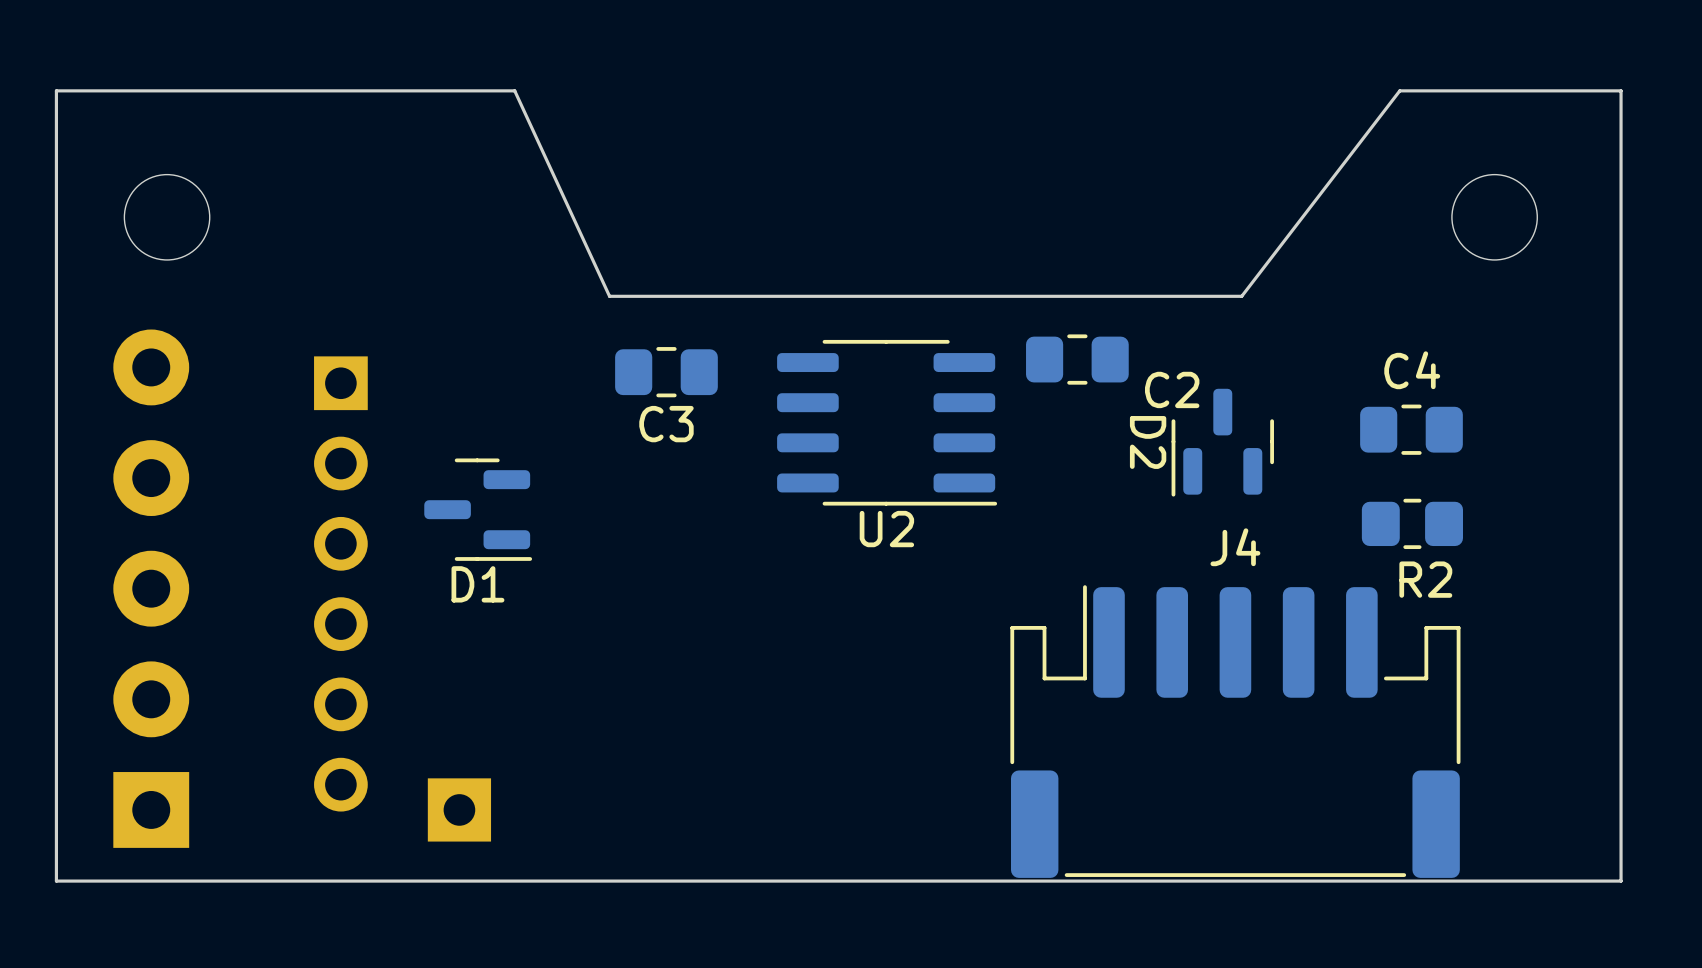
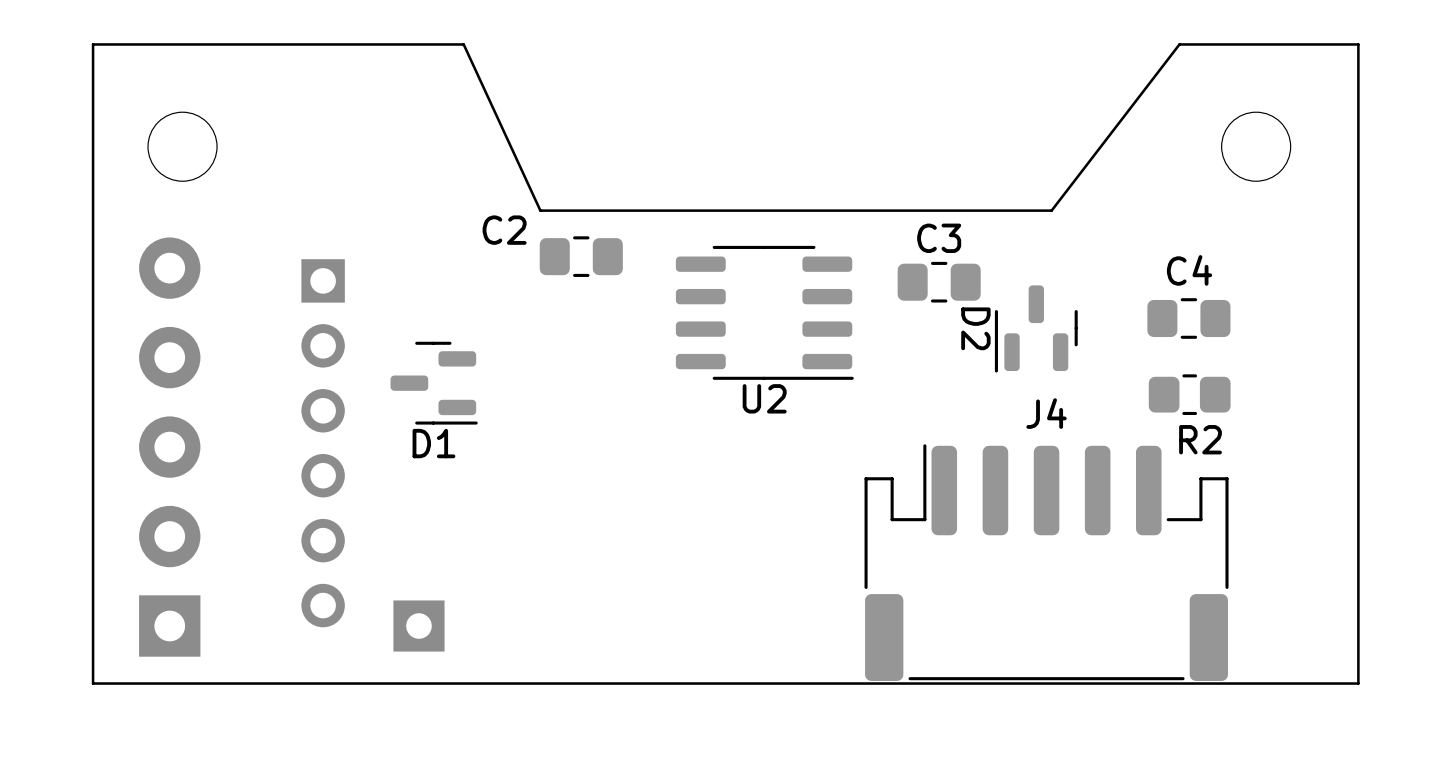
C2 position: (1077, 359) -> (581, 256)
C3 position: (666, 372) -> (939, 282)
C2 name position: C2 (1172, 389) -> C2 (504, 230)
C3 name position: C3 (666, 424) -> C3 (939, 238)

